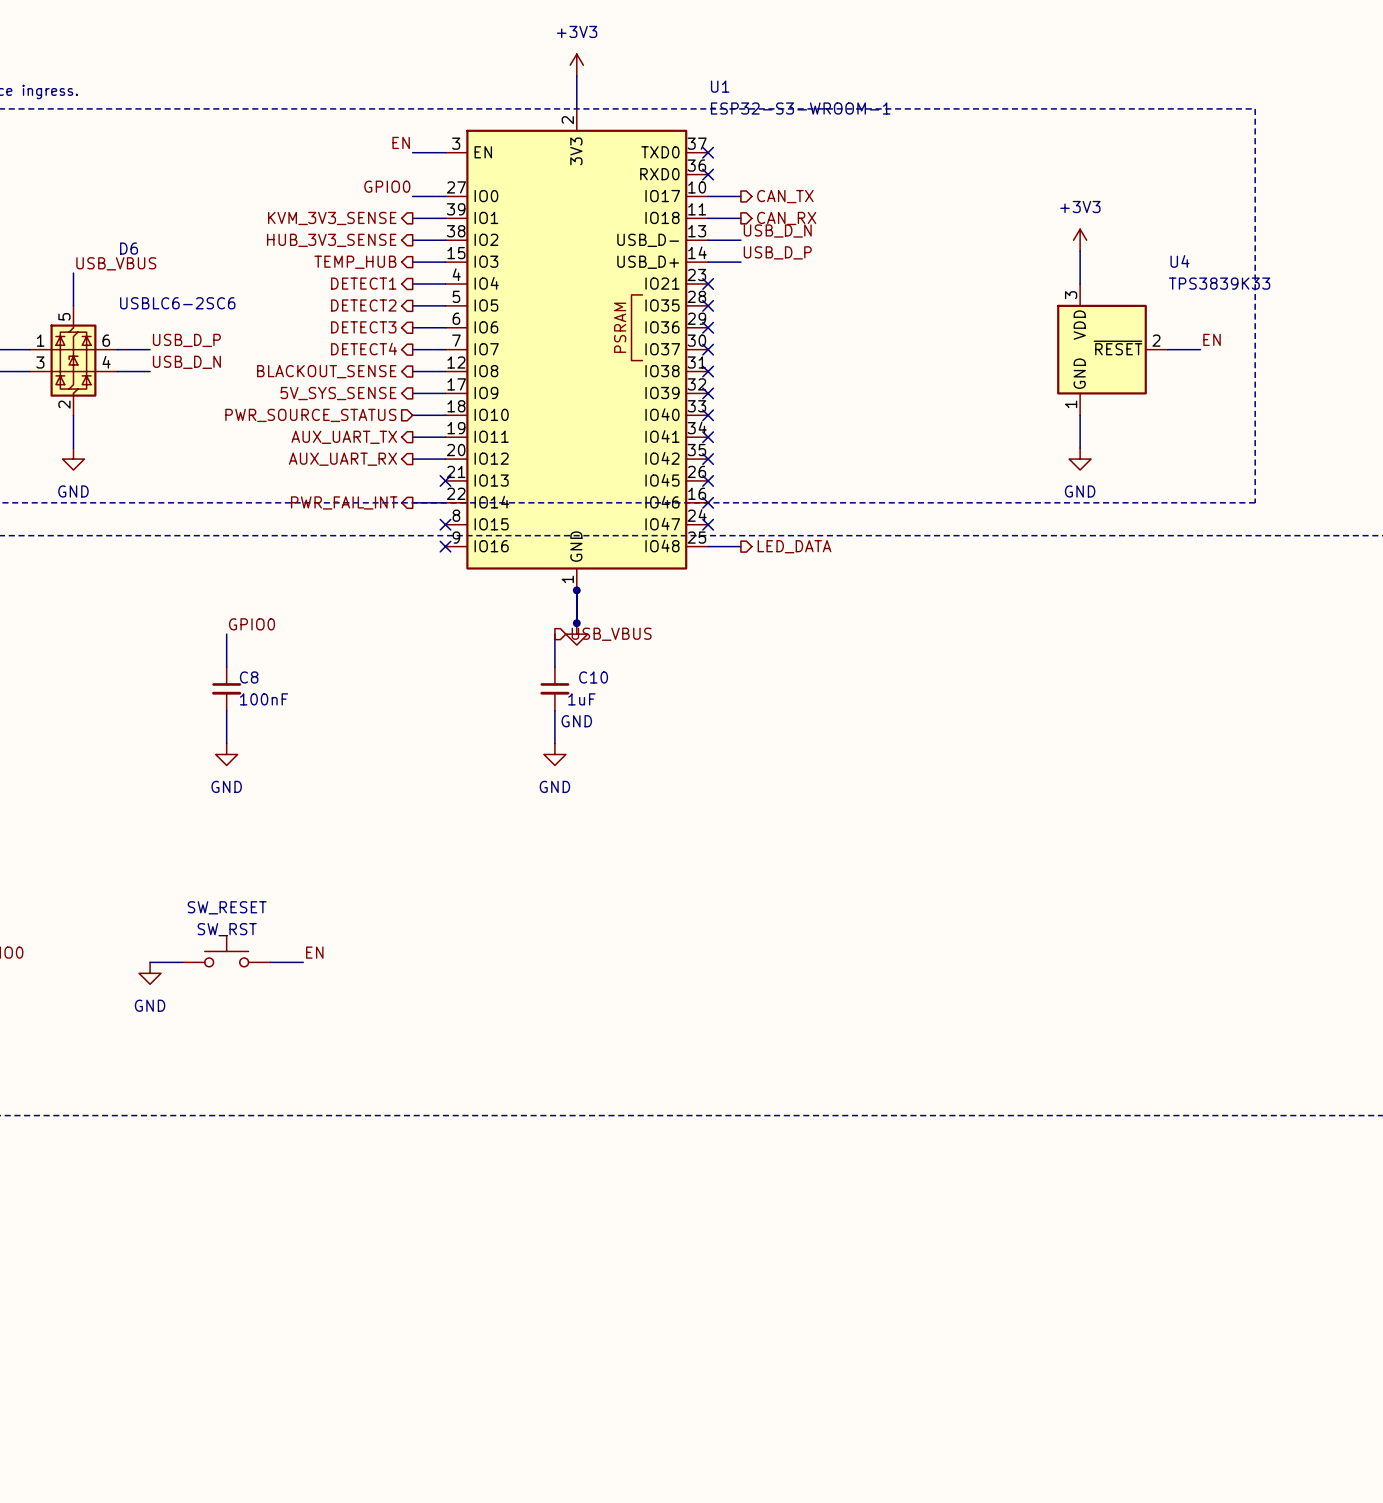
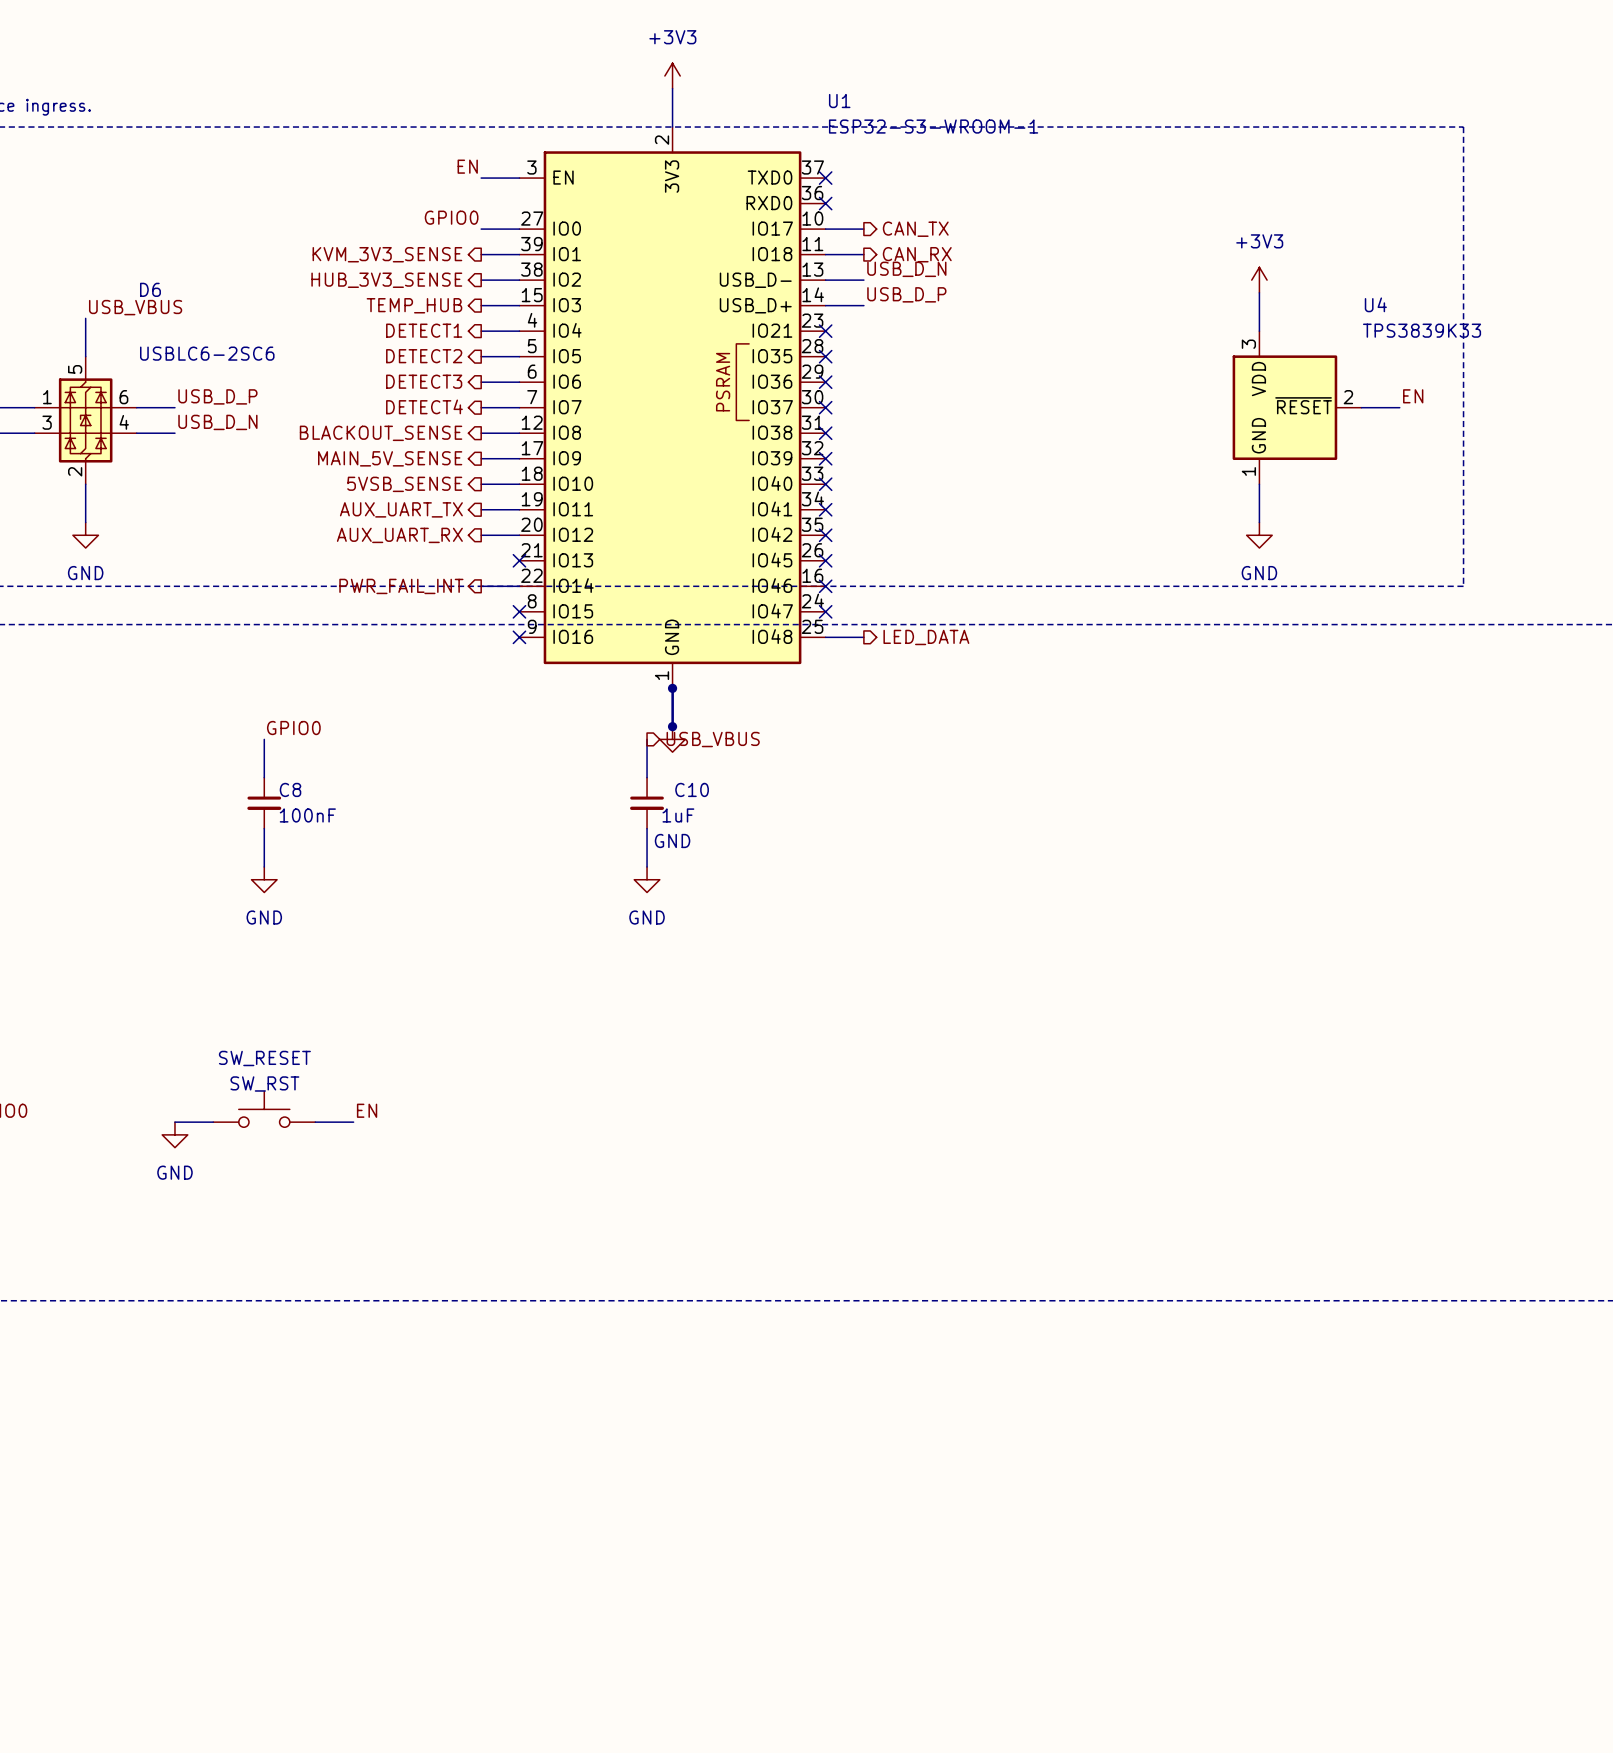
hierarchical label: 5V_SYS_SENSE (338, 393) -> MAIN_5V_SENSE (390, 458)
hierarchical label shape: input (310, 415) -> output (404, 484)
hierarchical label: PWR_SOURCE_STATUS (310, 415) -> 5VSB_SENSE (404, 484)

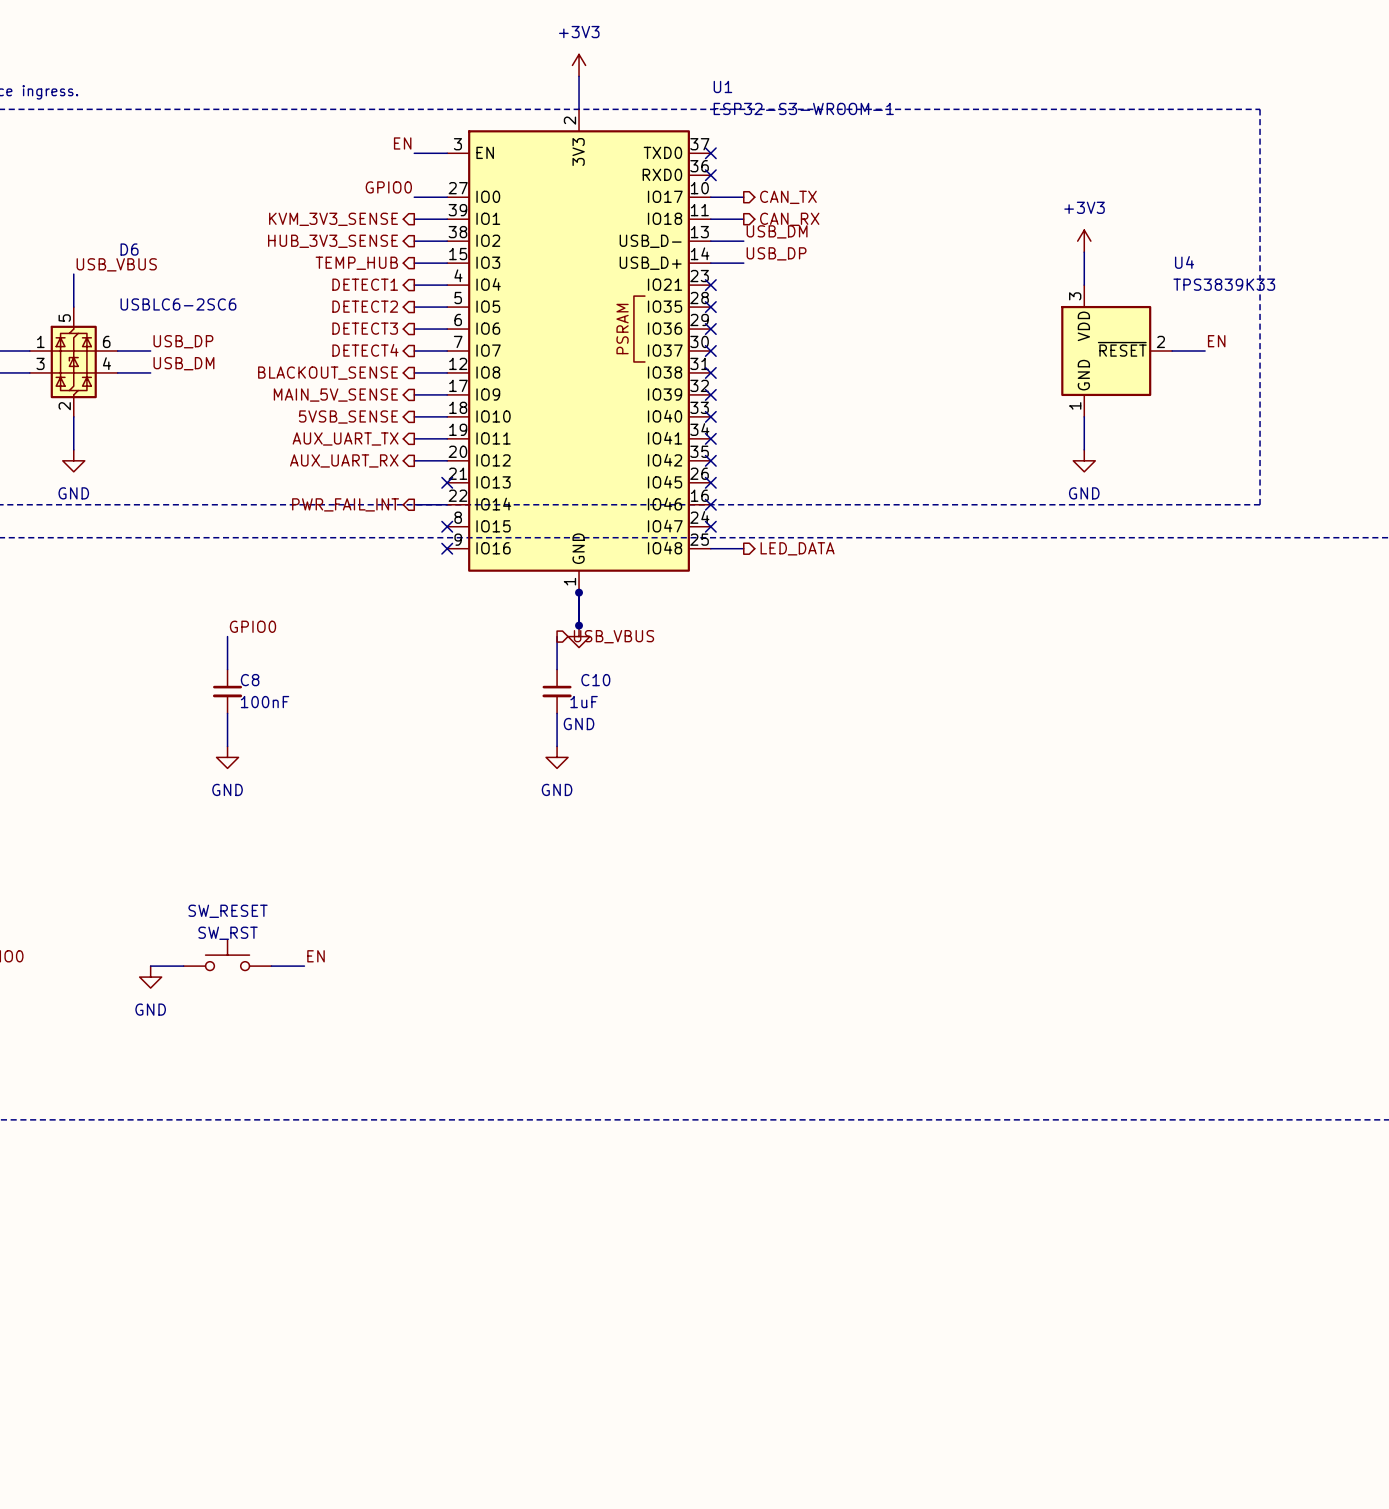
label: USB_D_N (906, 269) -> USB_DM (777, 231)
label: USB_D_P (906, 294) -> USB_DP (776, 253)
label: USB_D_P (217, 396) -> USB_DP (183, 341)
label: USB_D_N (217, 422) -> USB_DM (183, 363)

